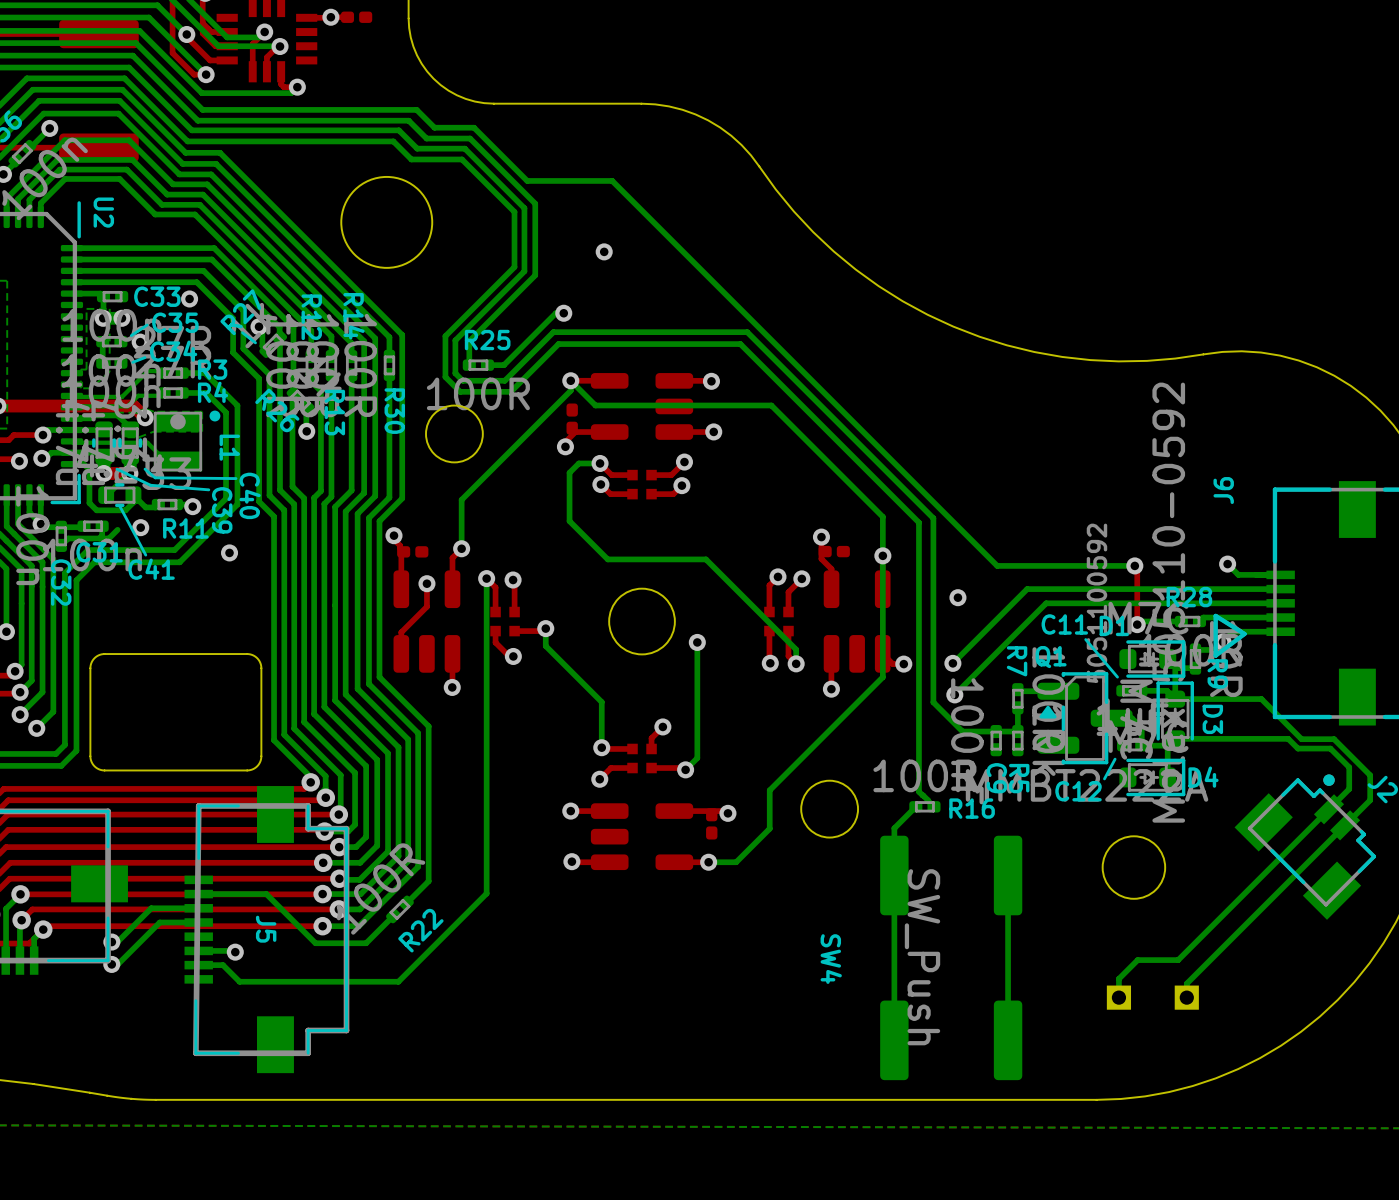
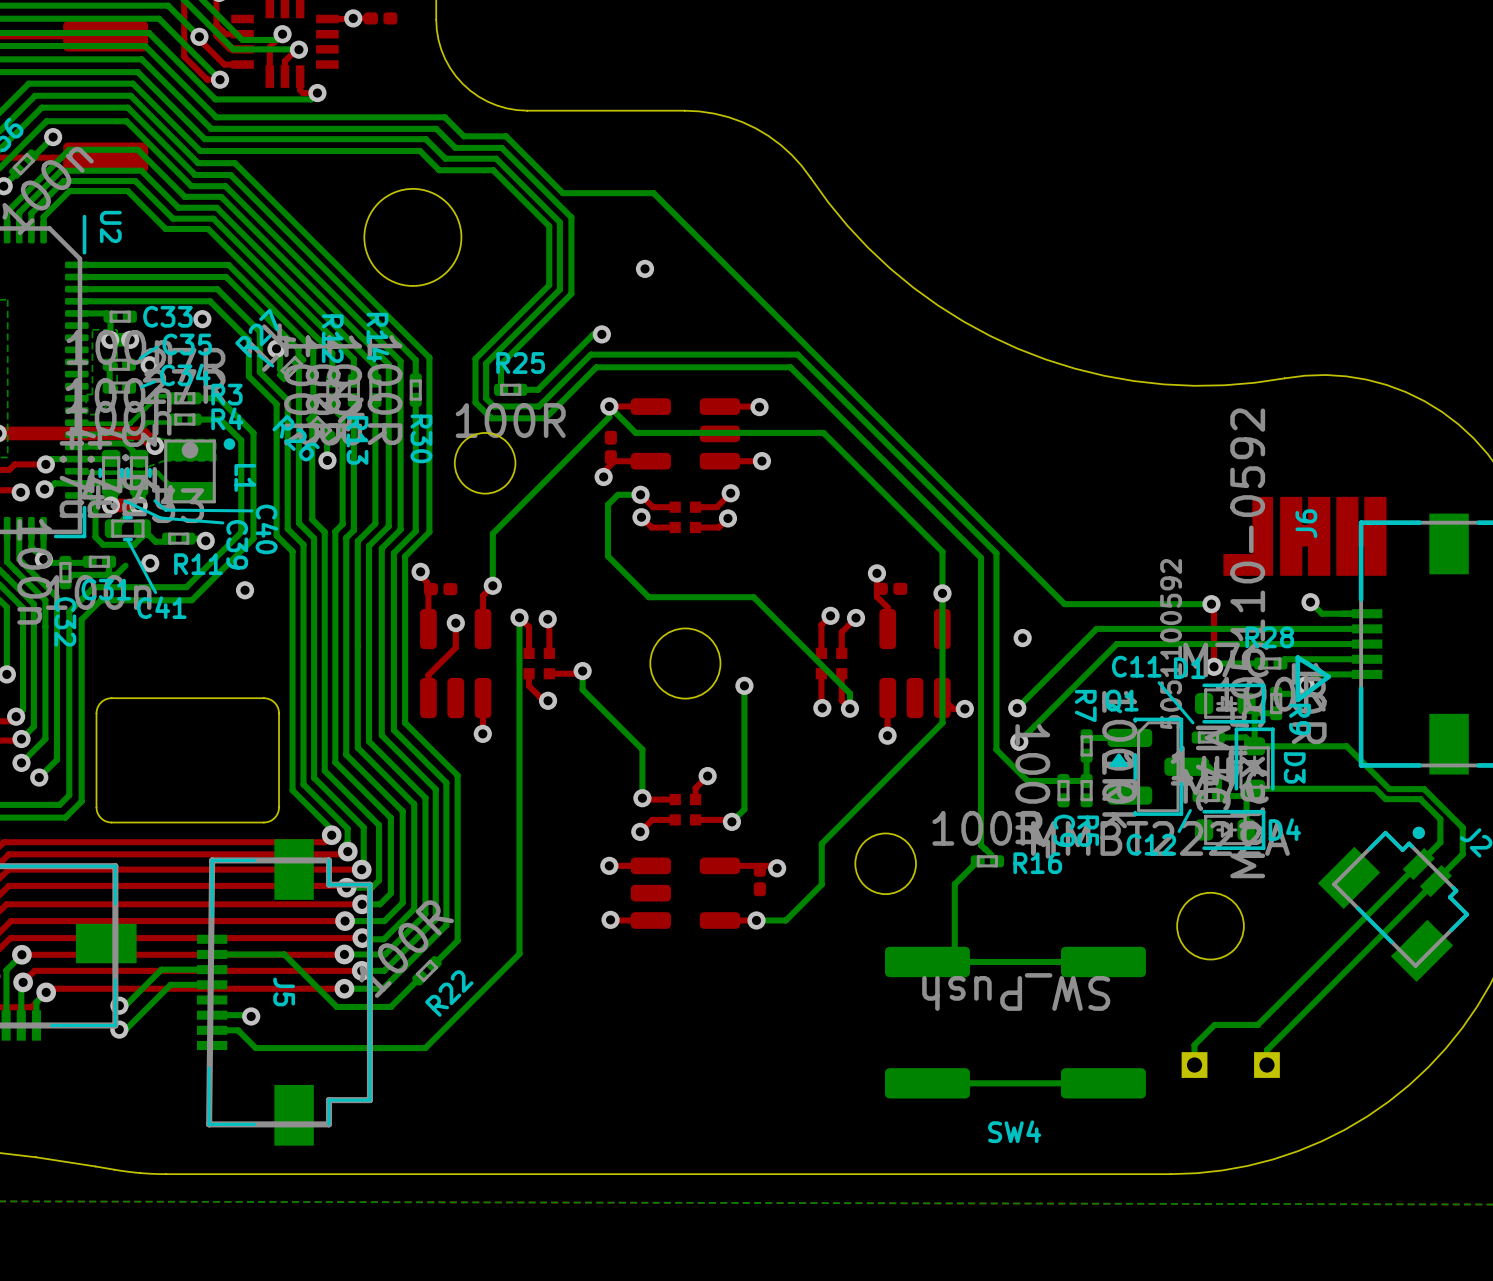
drawing: none -> [1223, 496, 1387, 576]
bottom track: (1008, 875) (1008, 1040) -> none
bottom track: (894, 893) (894, 1040) -> (954, 954) (933, 955) (927, 961) (1103, 961)
SW4 rotation: 0° (951, 957) -> 90° clockwise (1015, 1022)
SW4 name position: SW4 (831, 959) -> SW4 (1014, 1131)
bottom track: none -> (1103, 1083) (927, 1083)

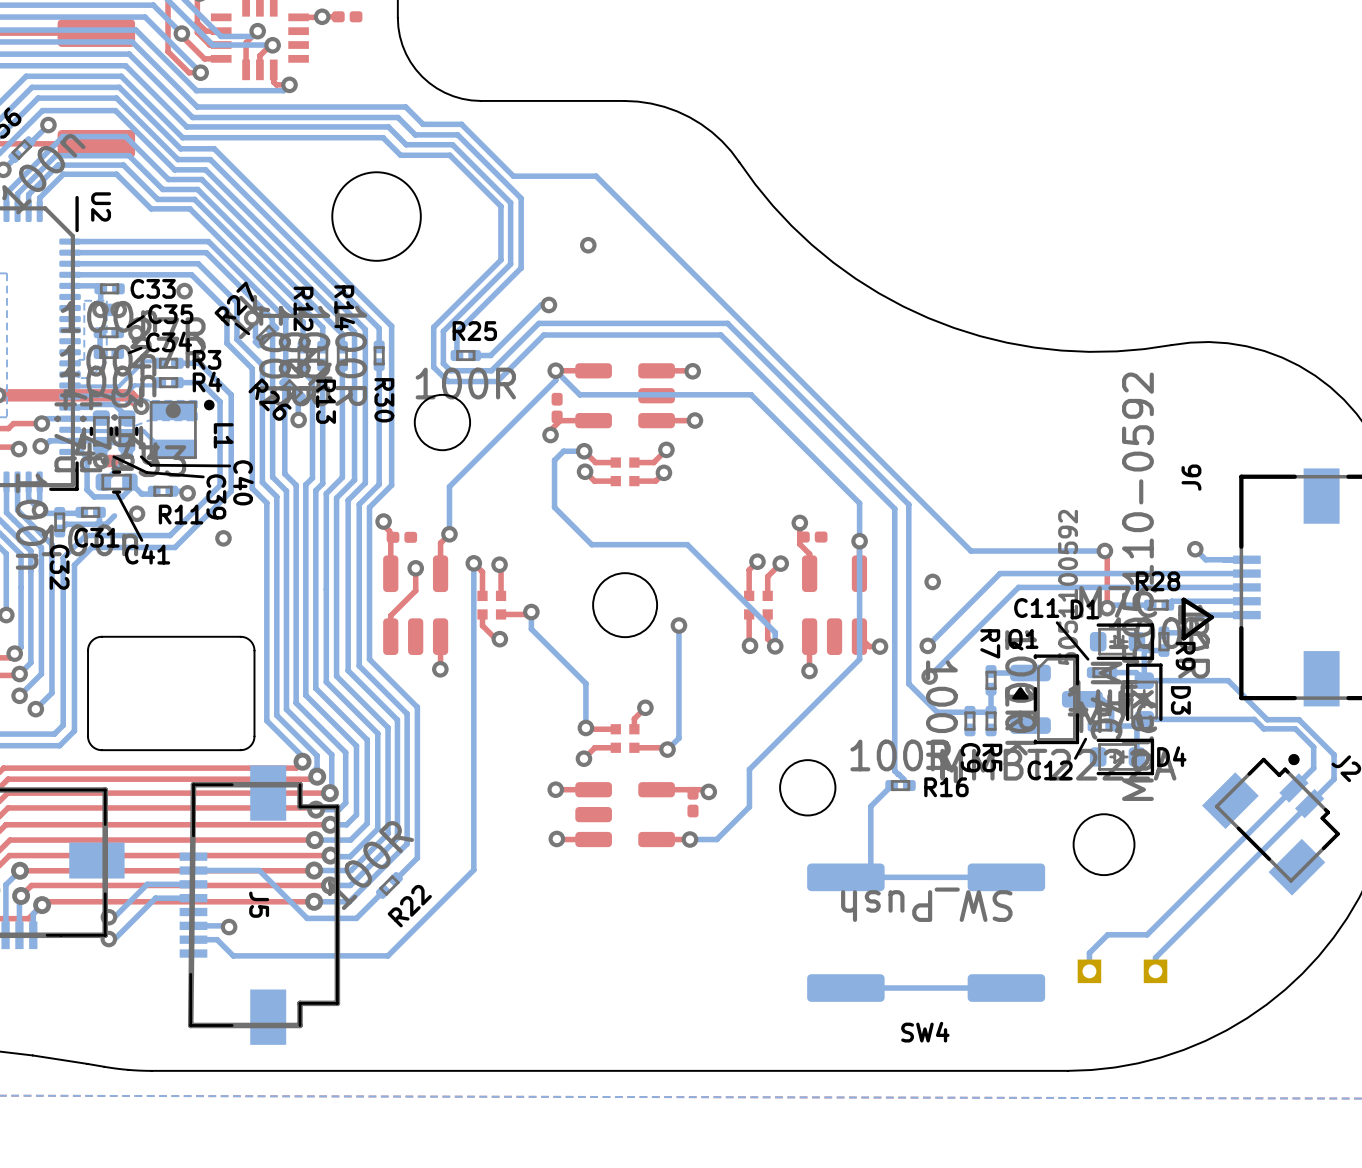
drawing: [1223, 496, 1387, 576] -> none

